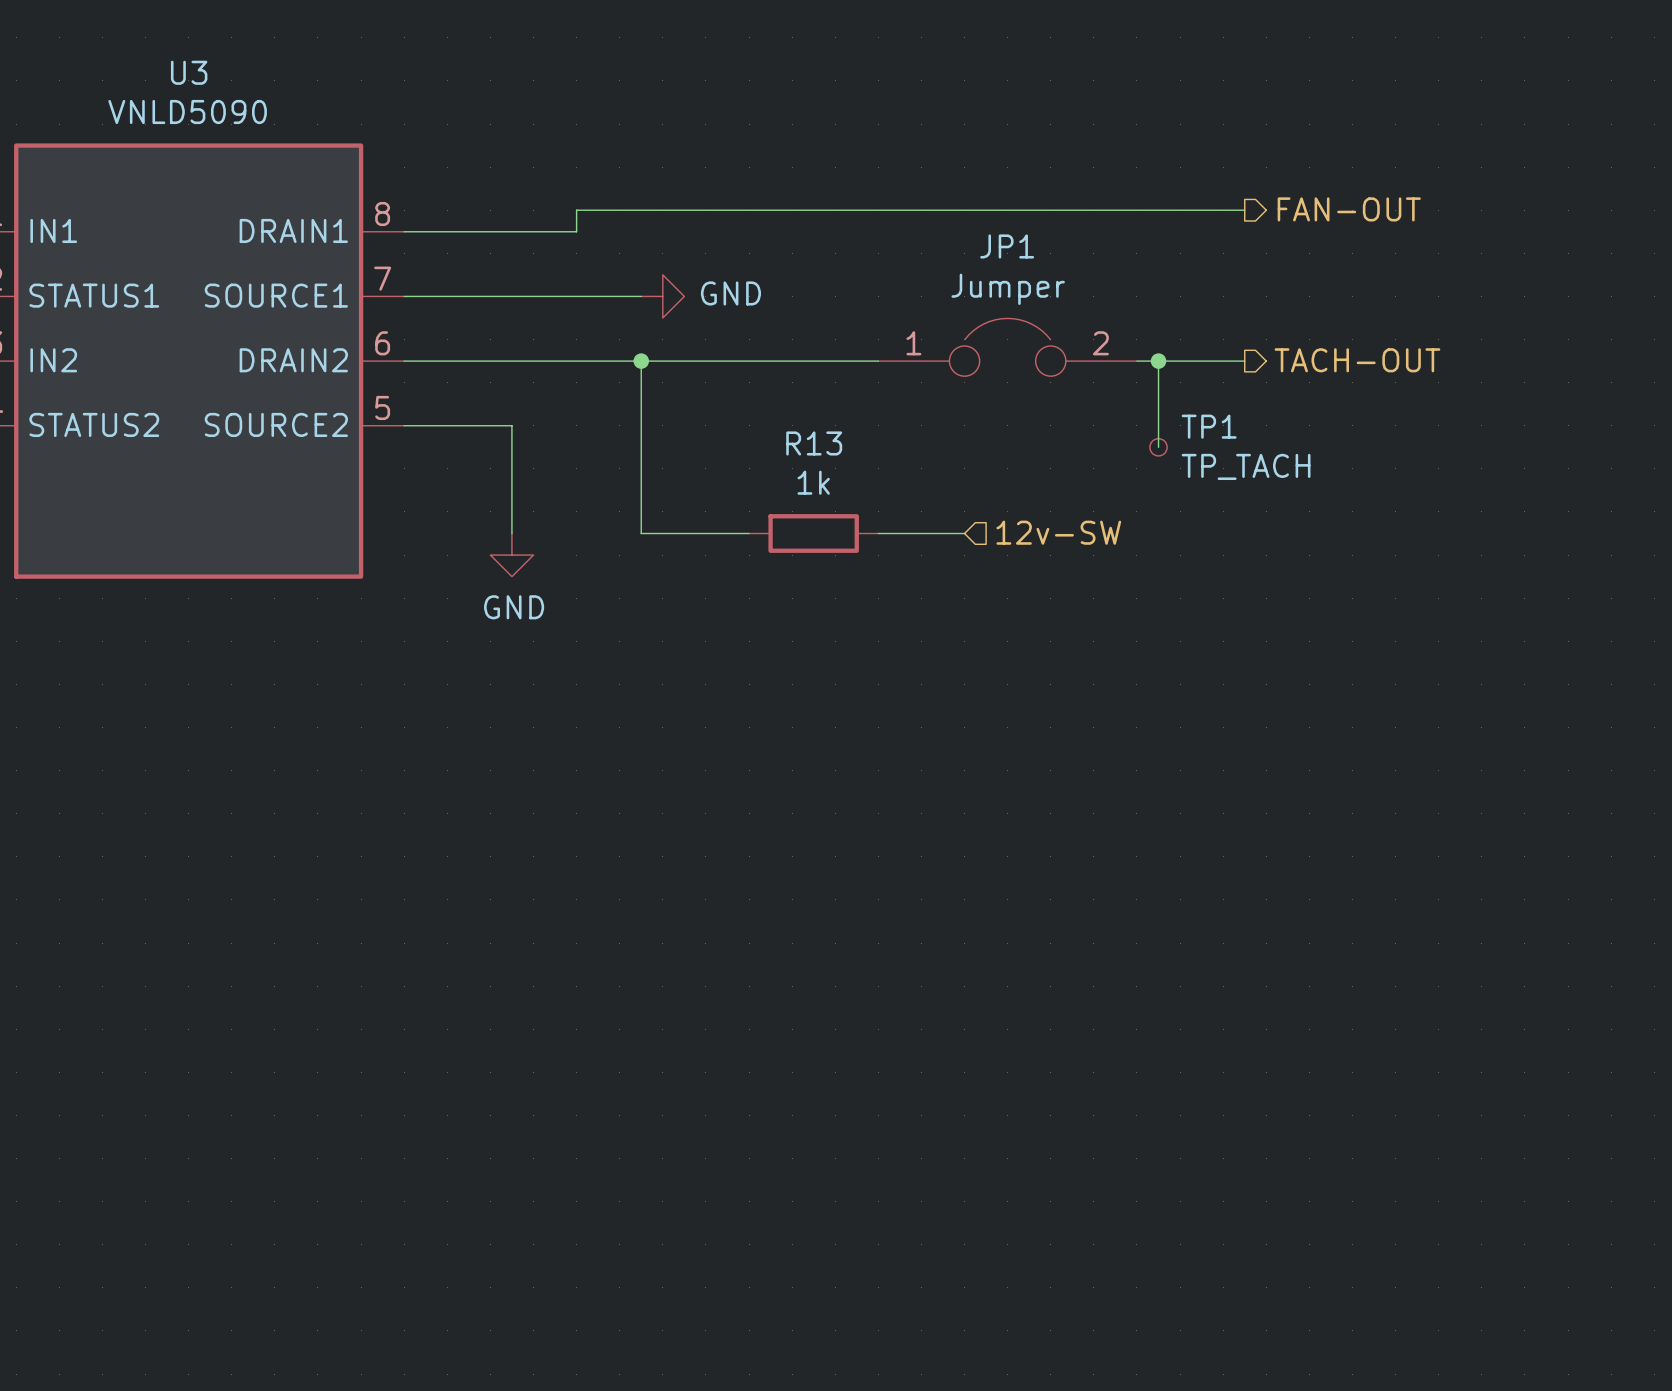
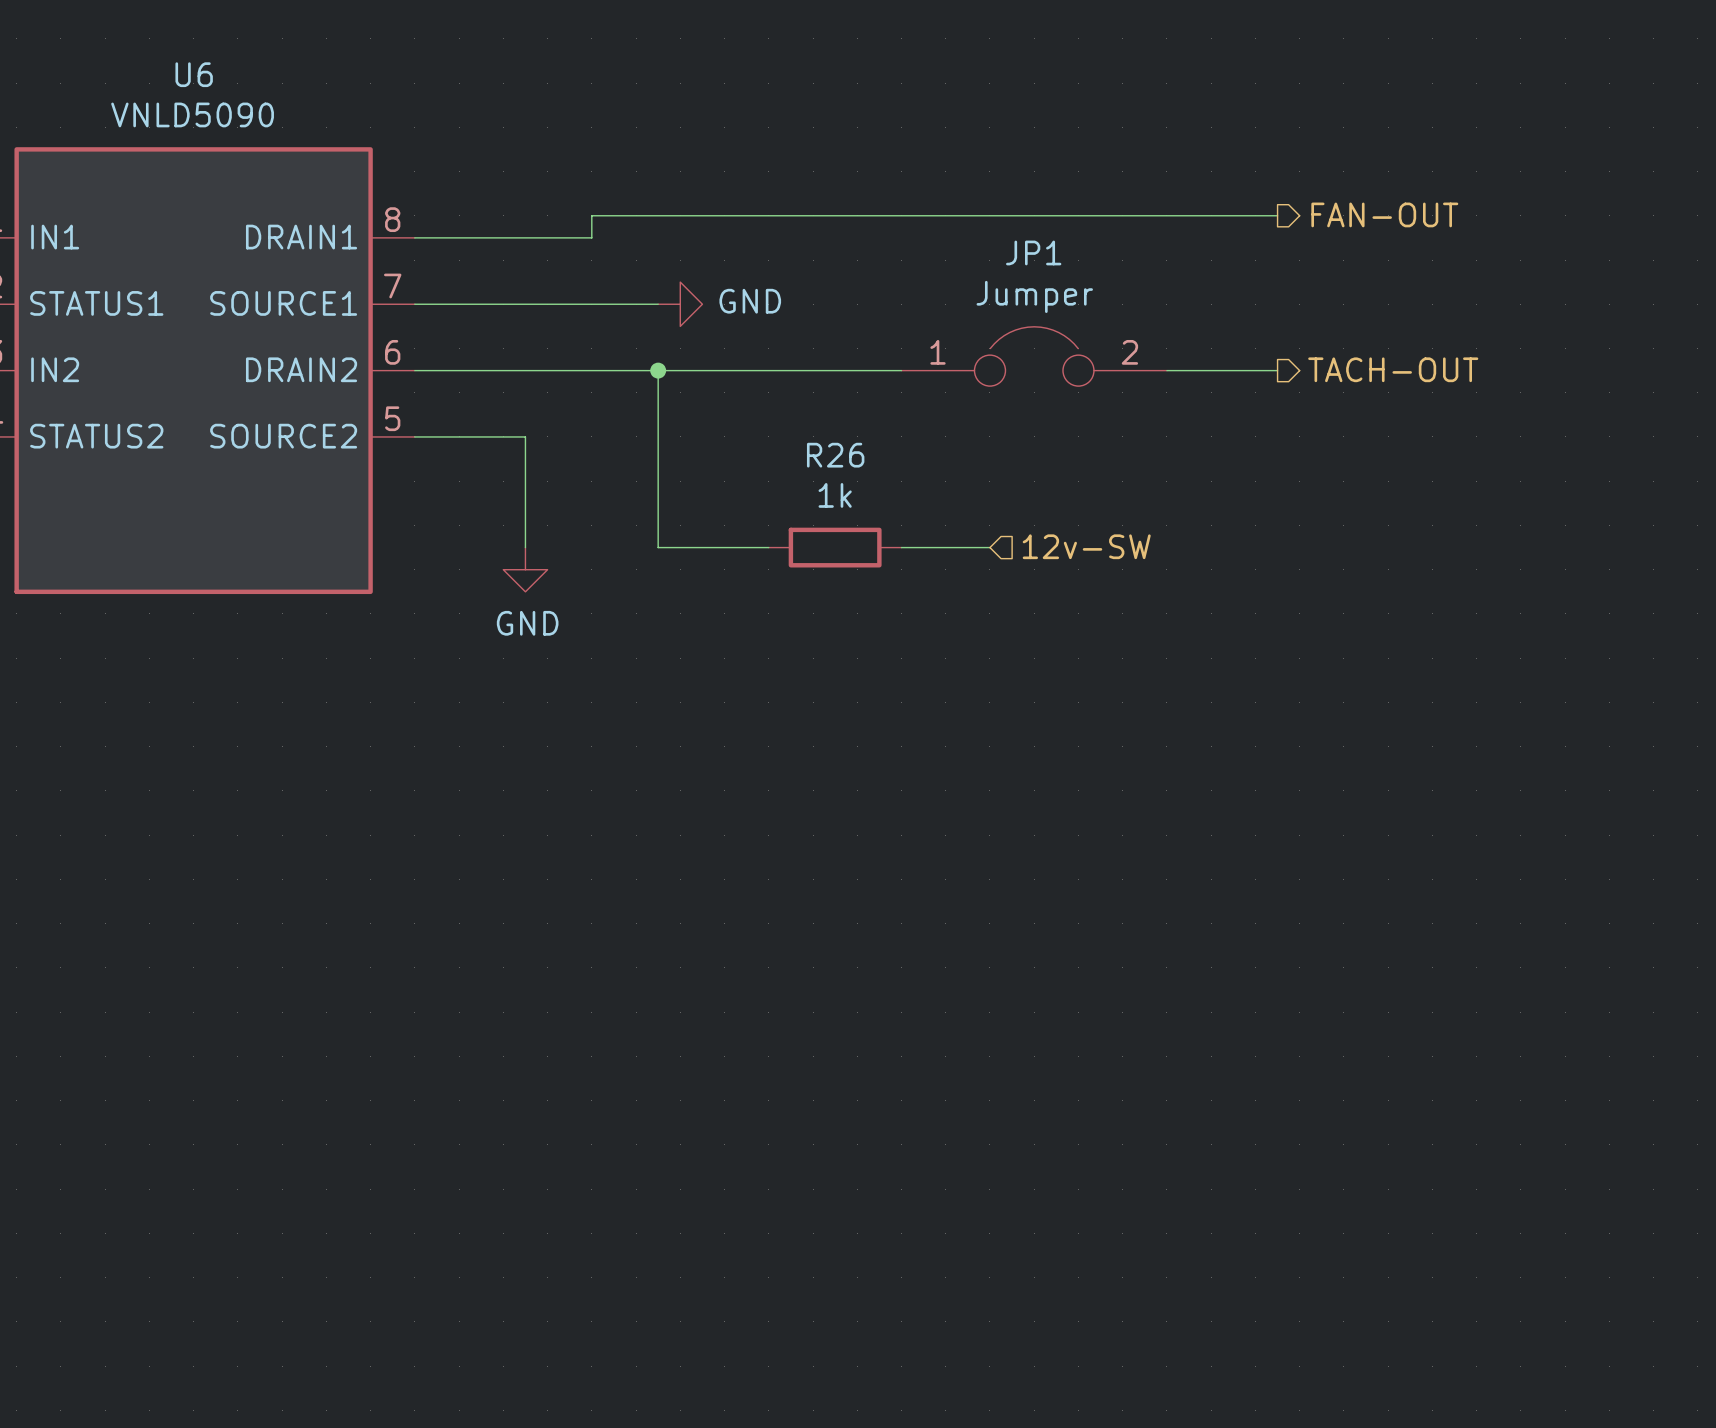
U3 name: U3 (189, 72) -> U6 (194, 74)
wire: (1158, 361) (1158, 447) -> none
junction: (1158, 361) -> none
R13 name: R13 (814, 443) -> R26 (835, 455)
TP1: TP_TACH (1158, 447) -> none

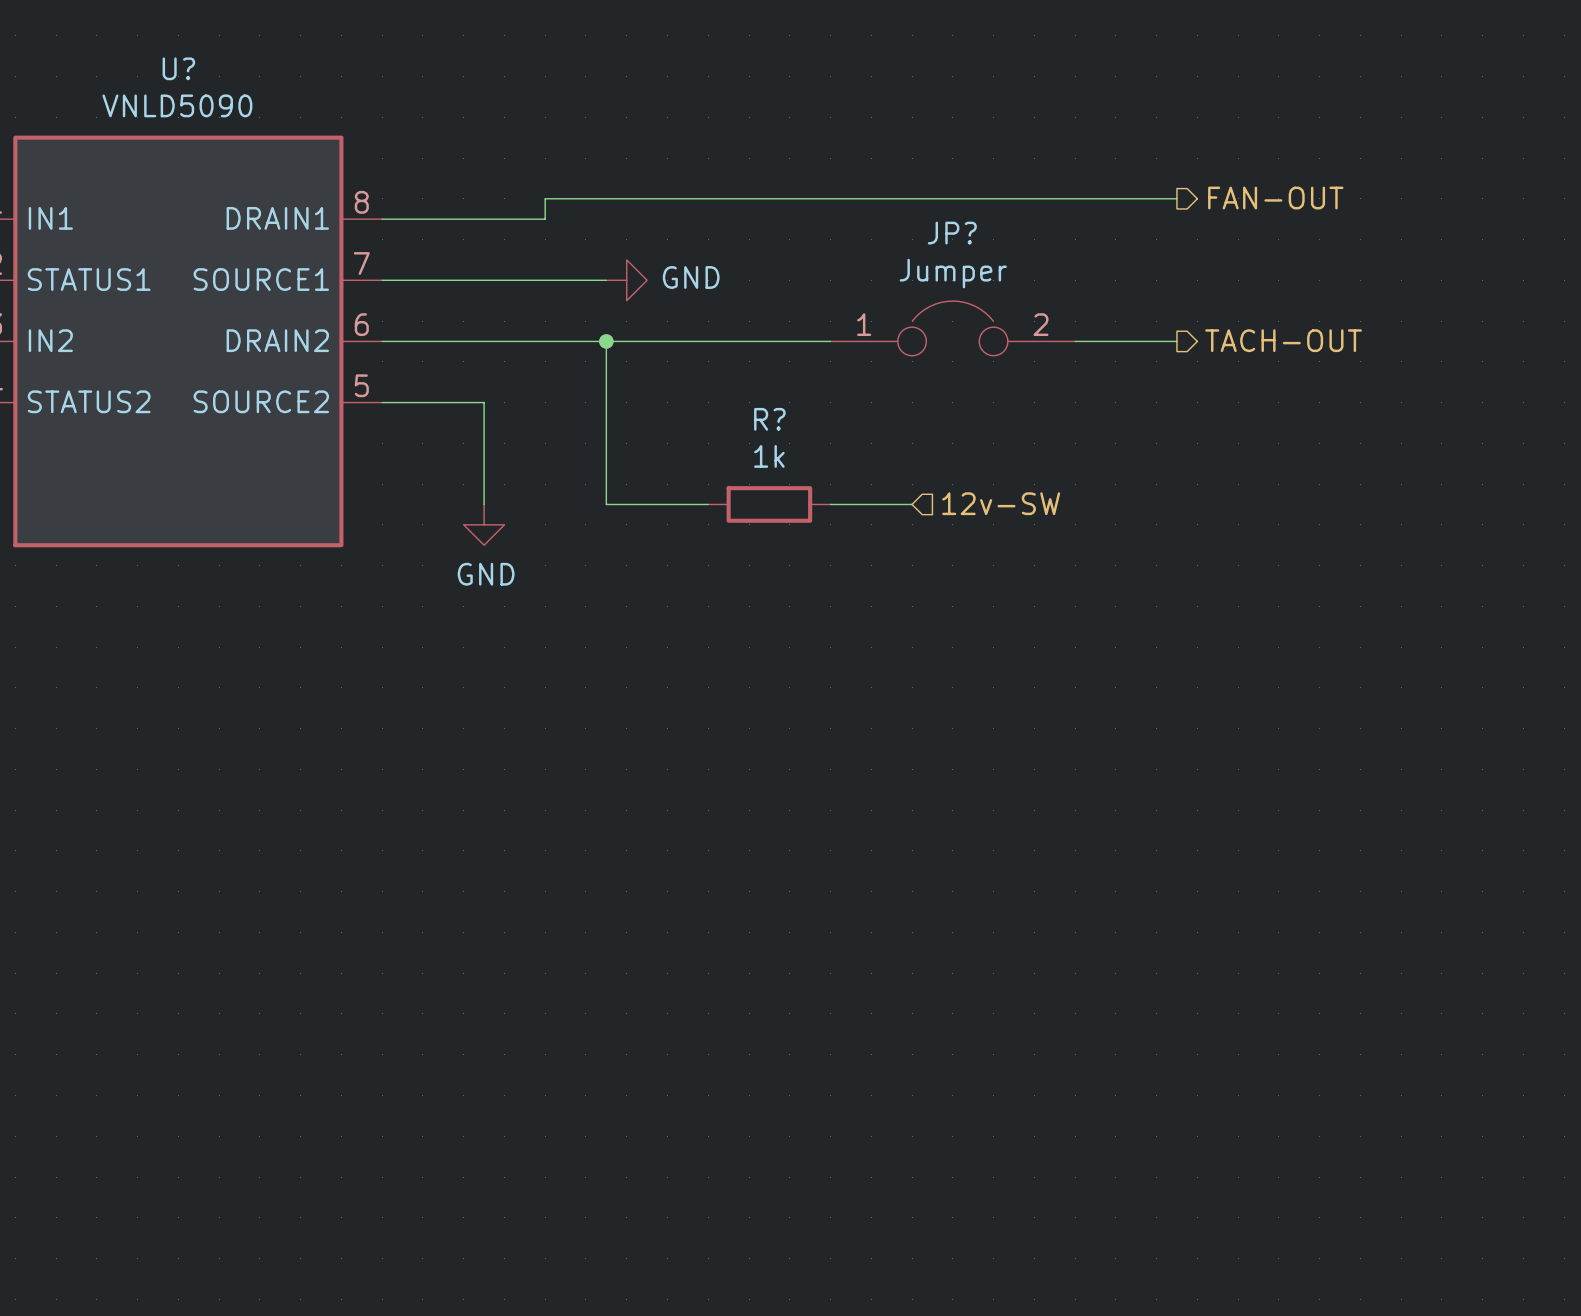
U6 name: U6 (194, 74) -> U? (178, 68)
JP1 name: JP1 (1033, 252) -> JP? (952, 233)
R26 name: R26 (835, 455) -> R? (769, 419)

